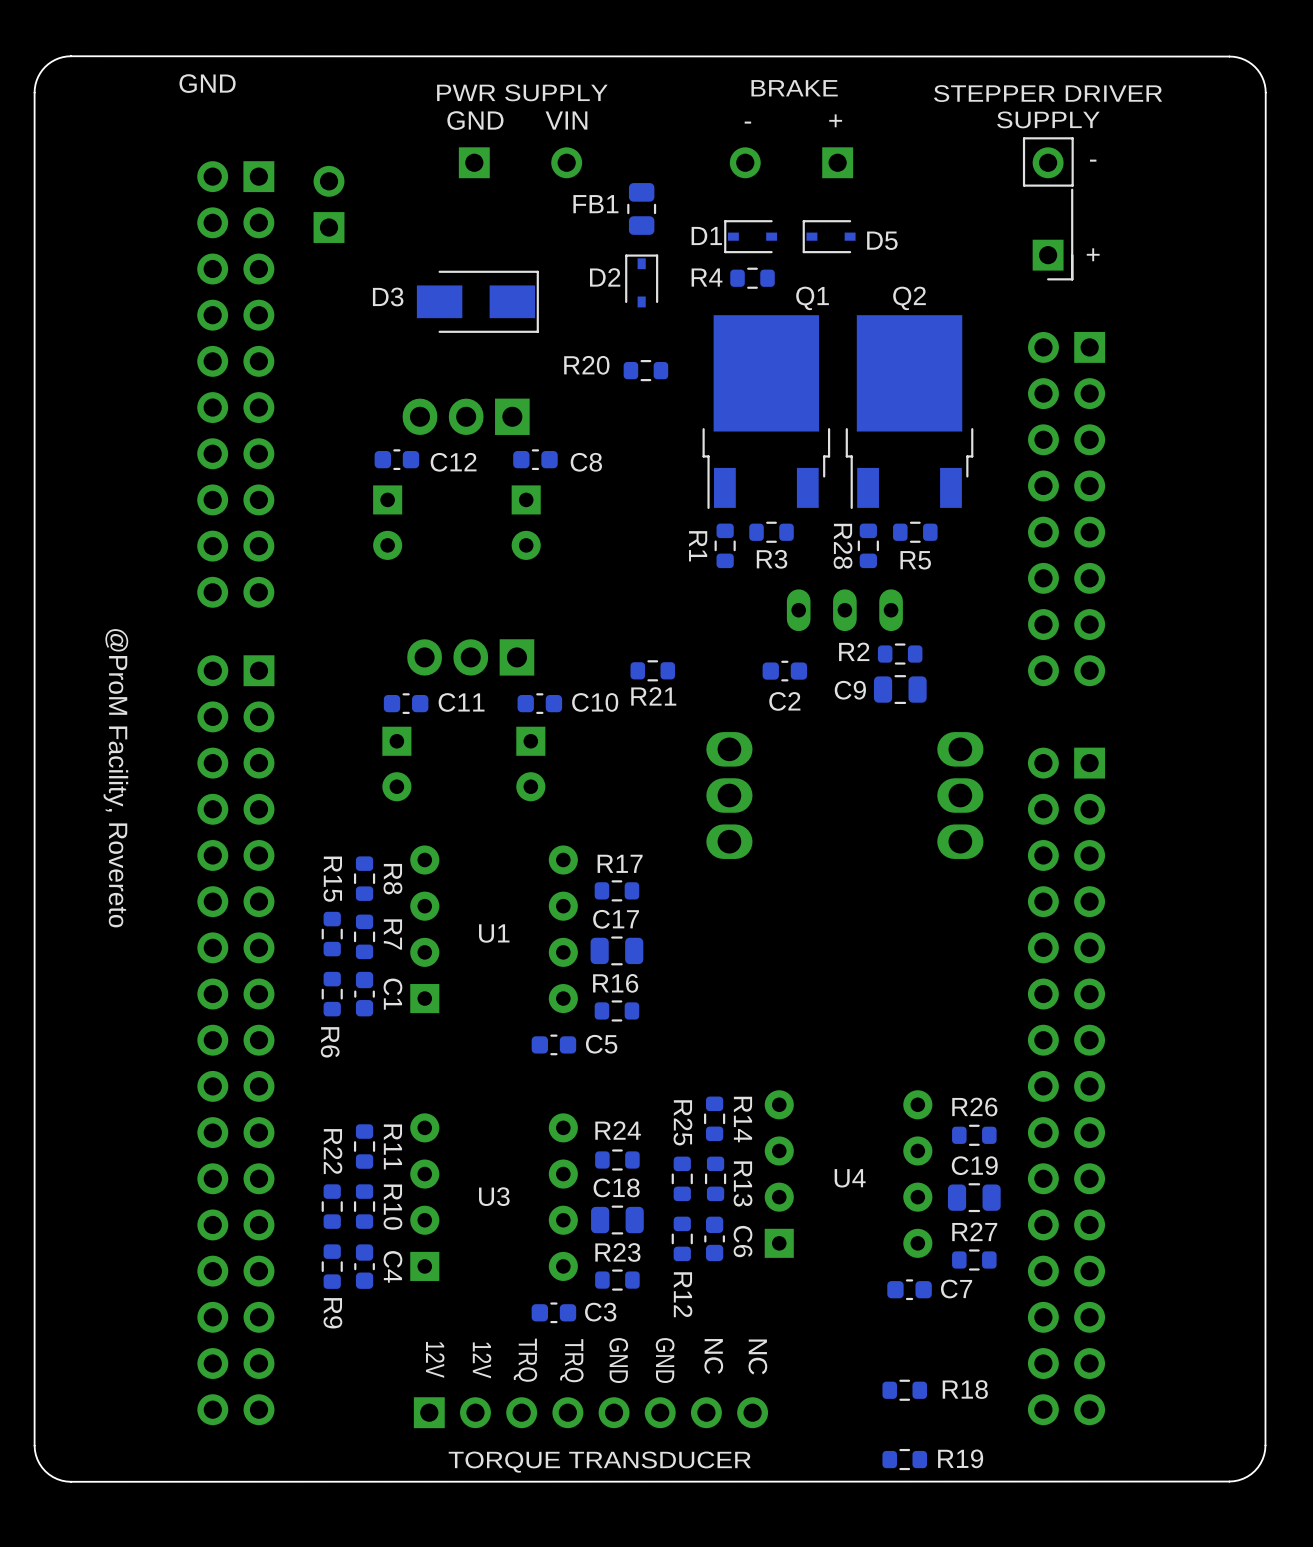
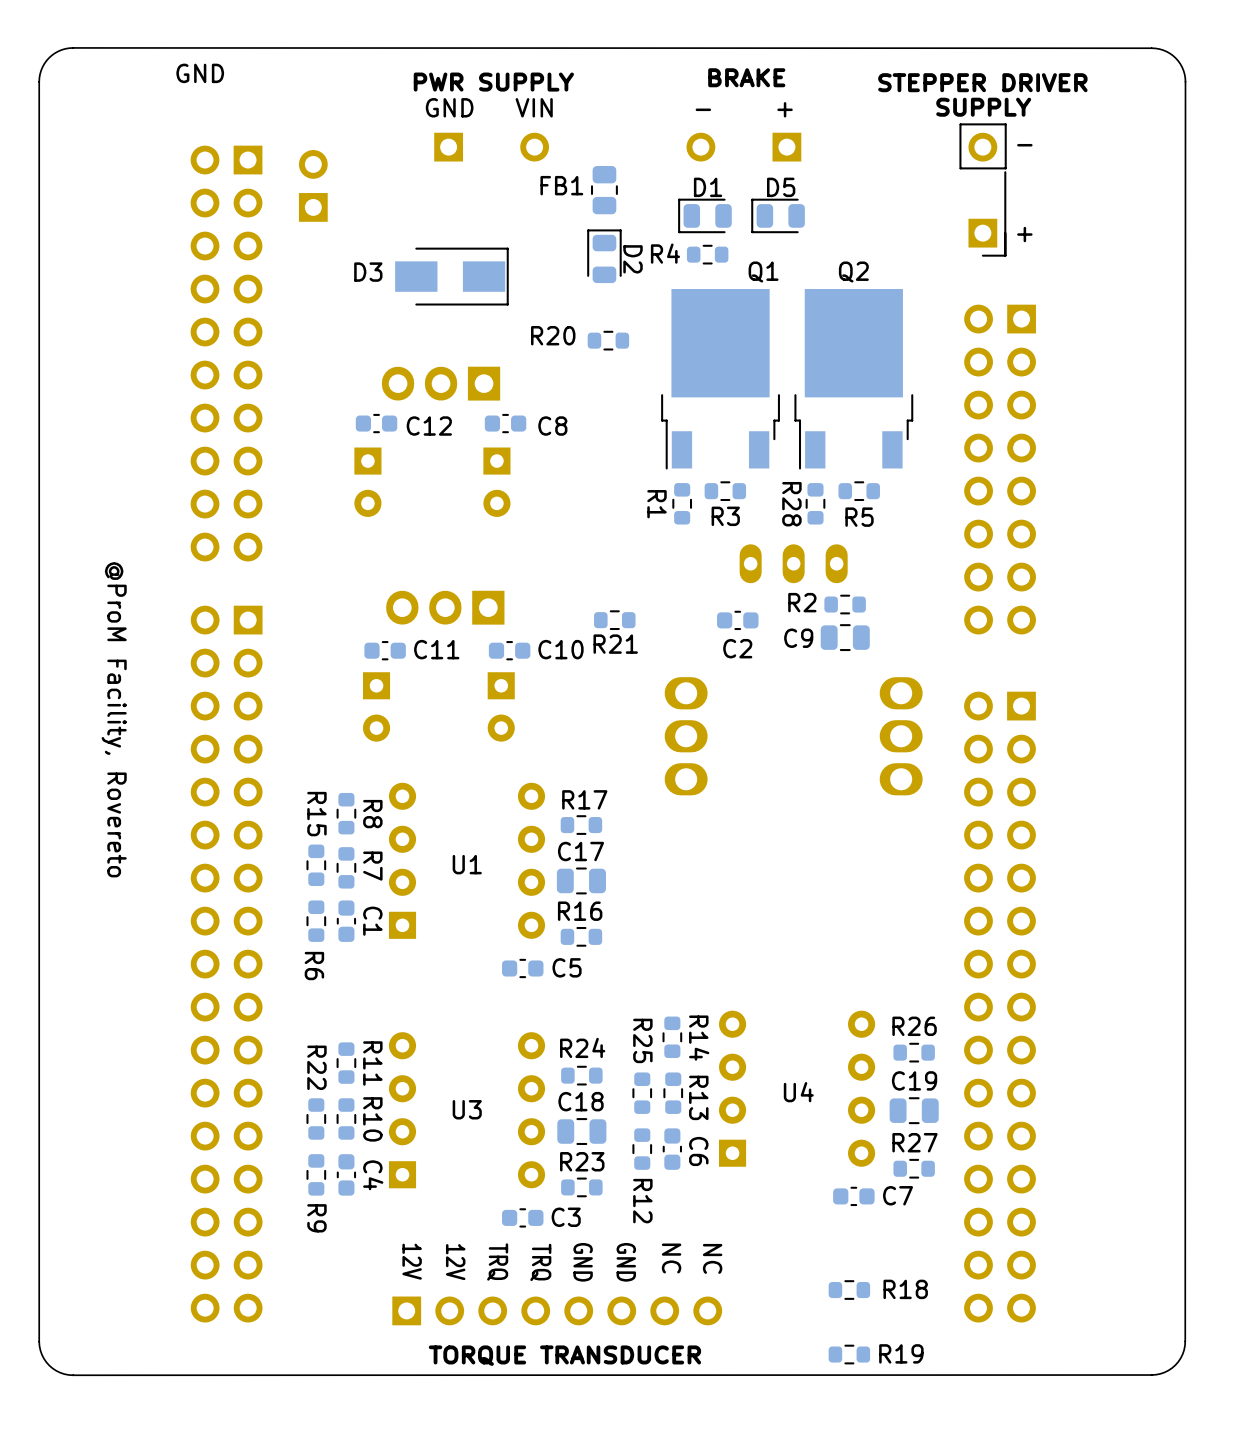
D1 footprint: [724, 220, 778, 254] -> [678, 198, 732, 234]
D5 footprint: [802, 220, 856, 254] -> [751, 198, 805, 234]
D1 name position: D1 (706, 235) -> D1 (708, 187)
D5 name position: D5 (882, 240) -> D5 (781, 187)
D2 footprint: [625, 254, 659, 308] -> [587, 229, 622, 284]
D2 name rotation: 0° (605, 277) -> 90° clockwise (633, 259)
D2 name position: D2 (605, 277) -> D2 (633, 259)

